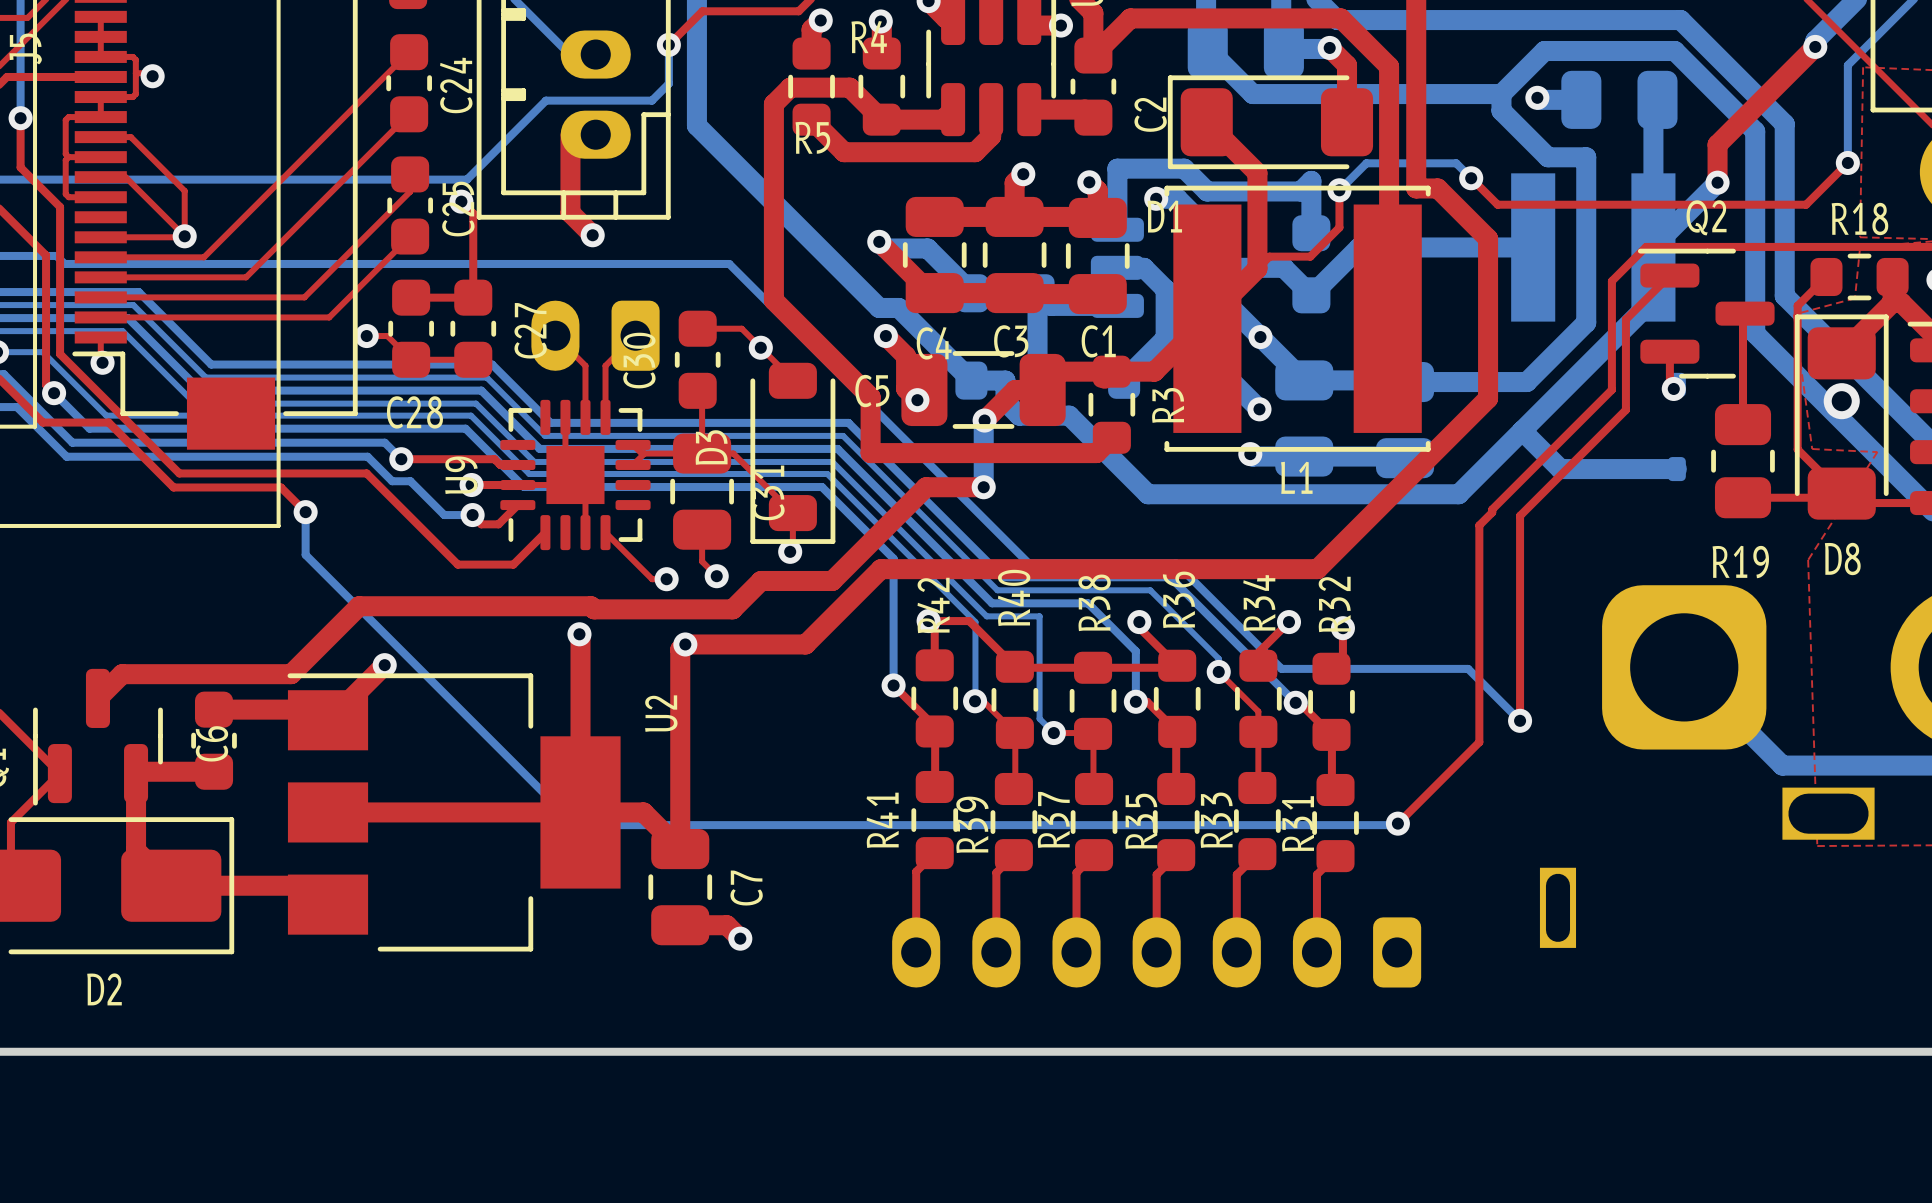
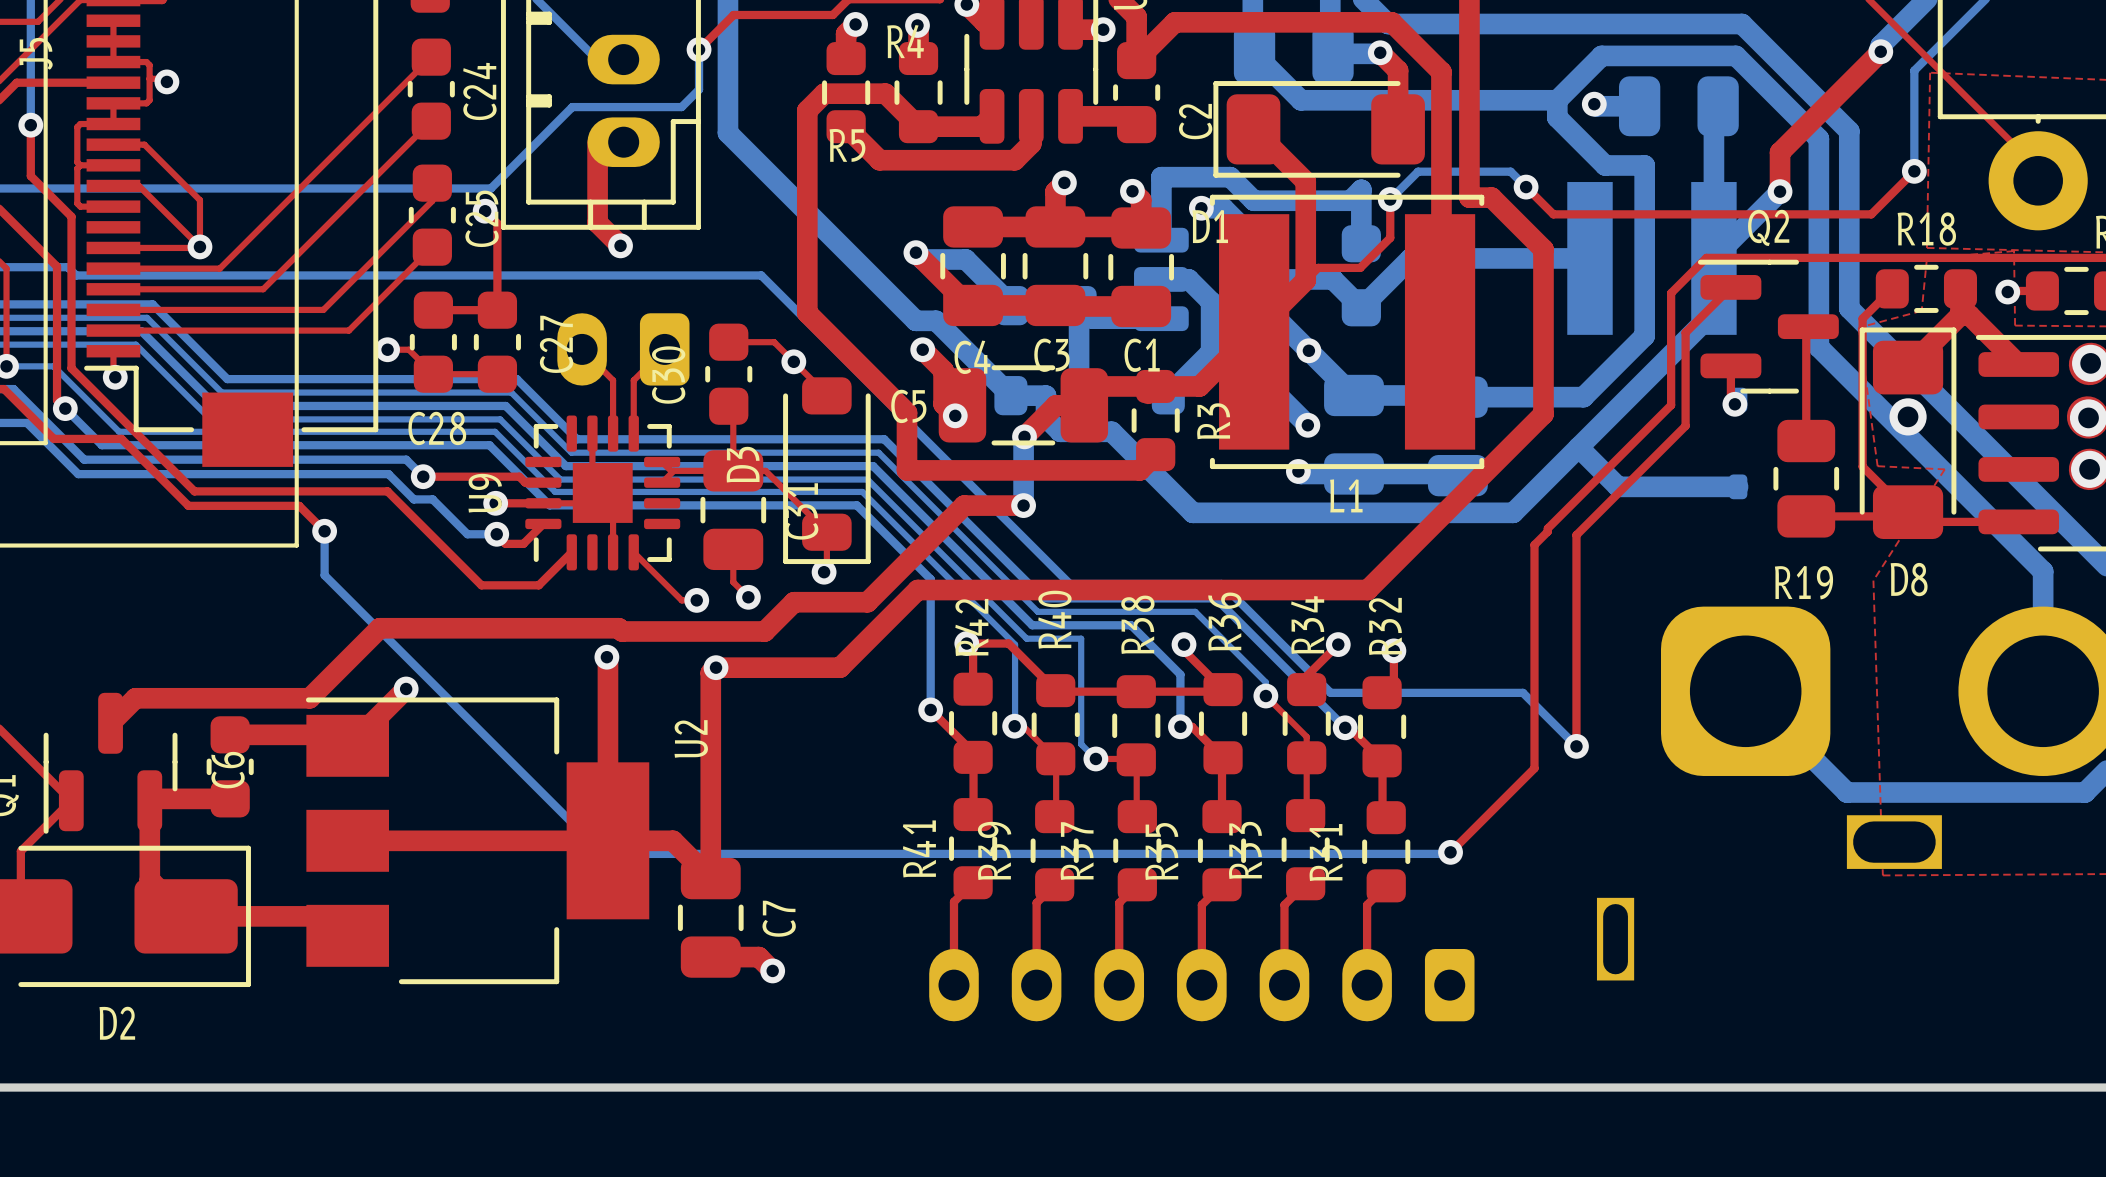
R37 name position: R37 (1053, 819) -> R37 (1077, 851)
R33 name position: R33 (1216, 820) -> R33 (1245, 850)
R35 name position: R35 (1141, 821) -> R35 (1161, 851)
R31 name position: R31 (1297, 823) -> R31 (1325, 852)
R39 name position: R39 (972, 824) -> R39 (994, 850)

